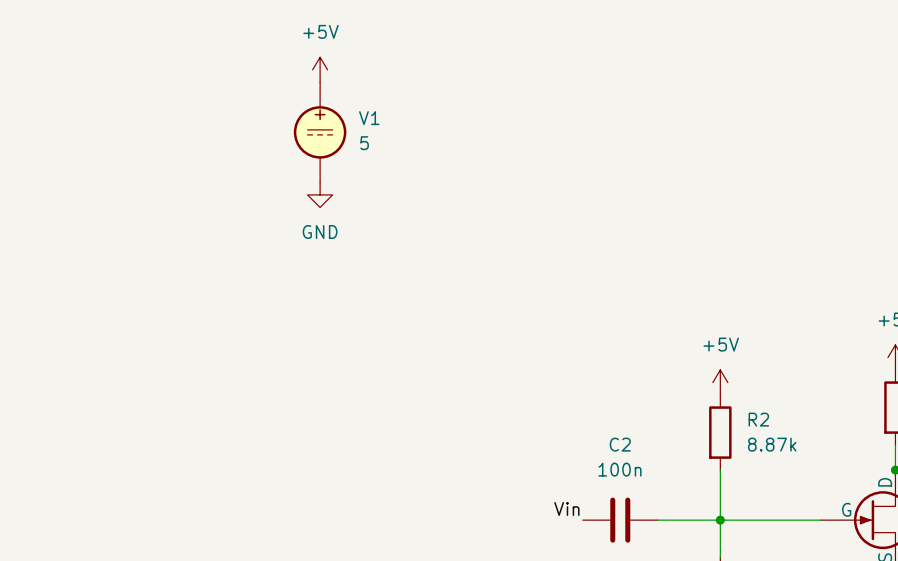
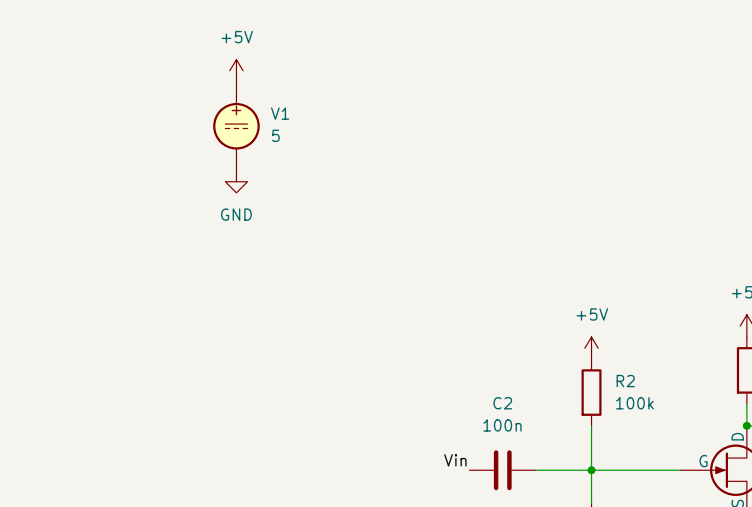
R2 value: 8.87k (772, 444) -> 100k (634, 403)

